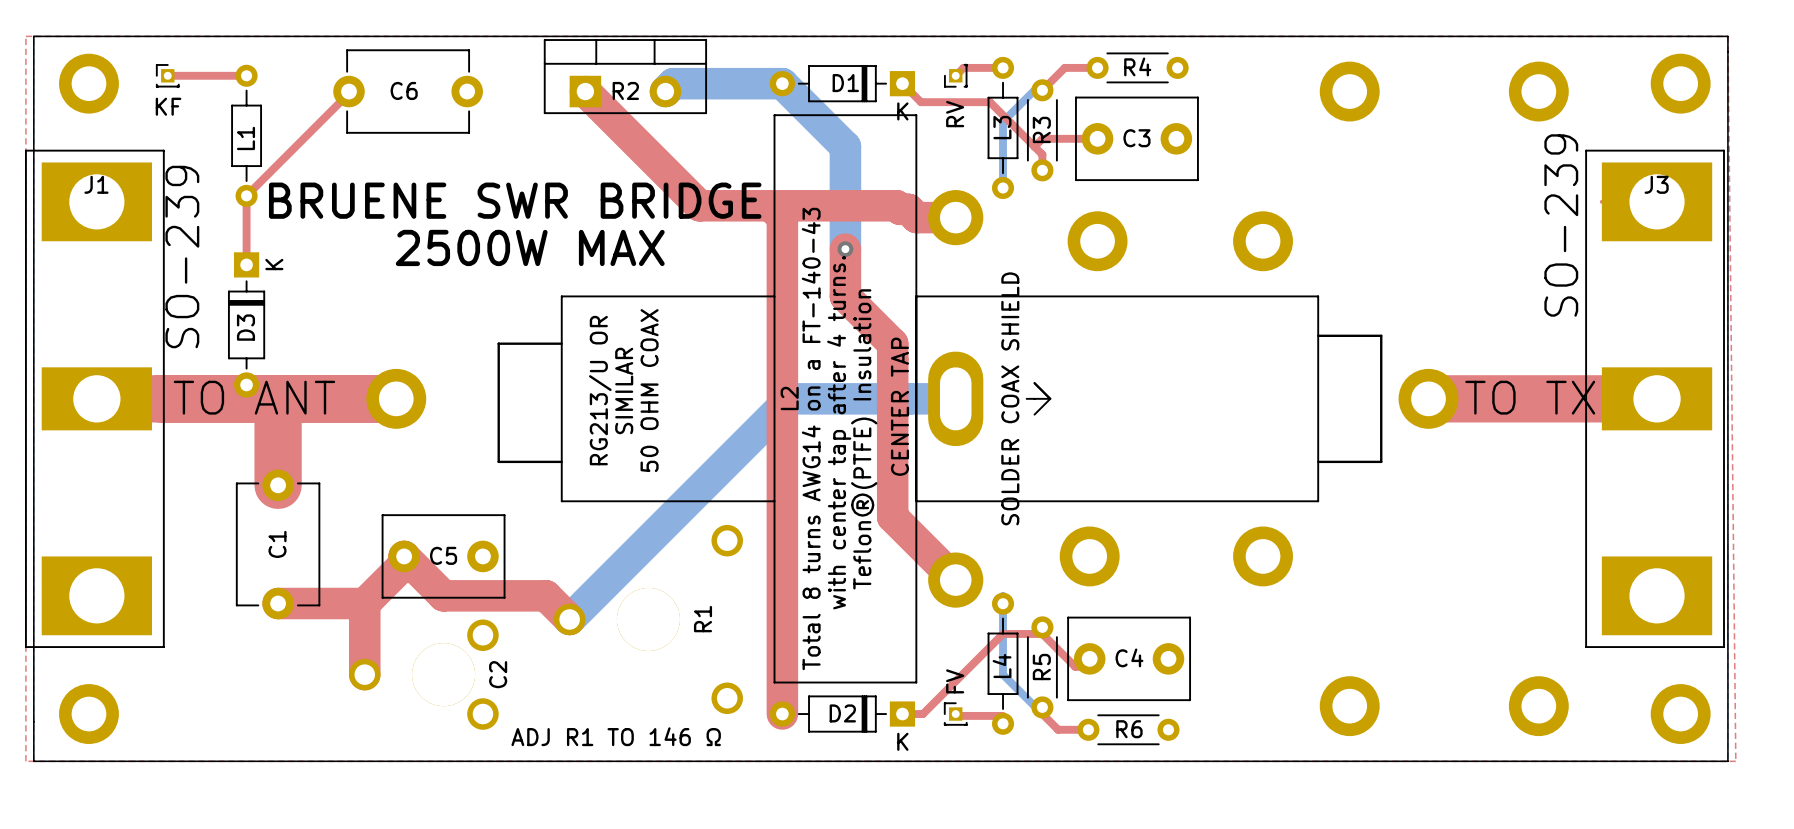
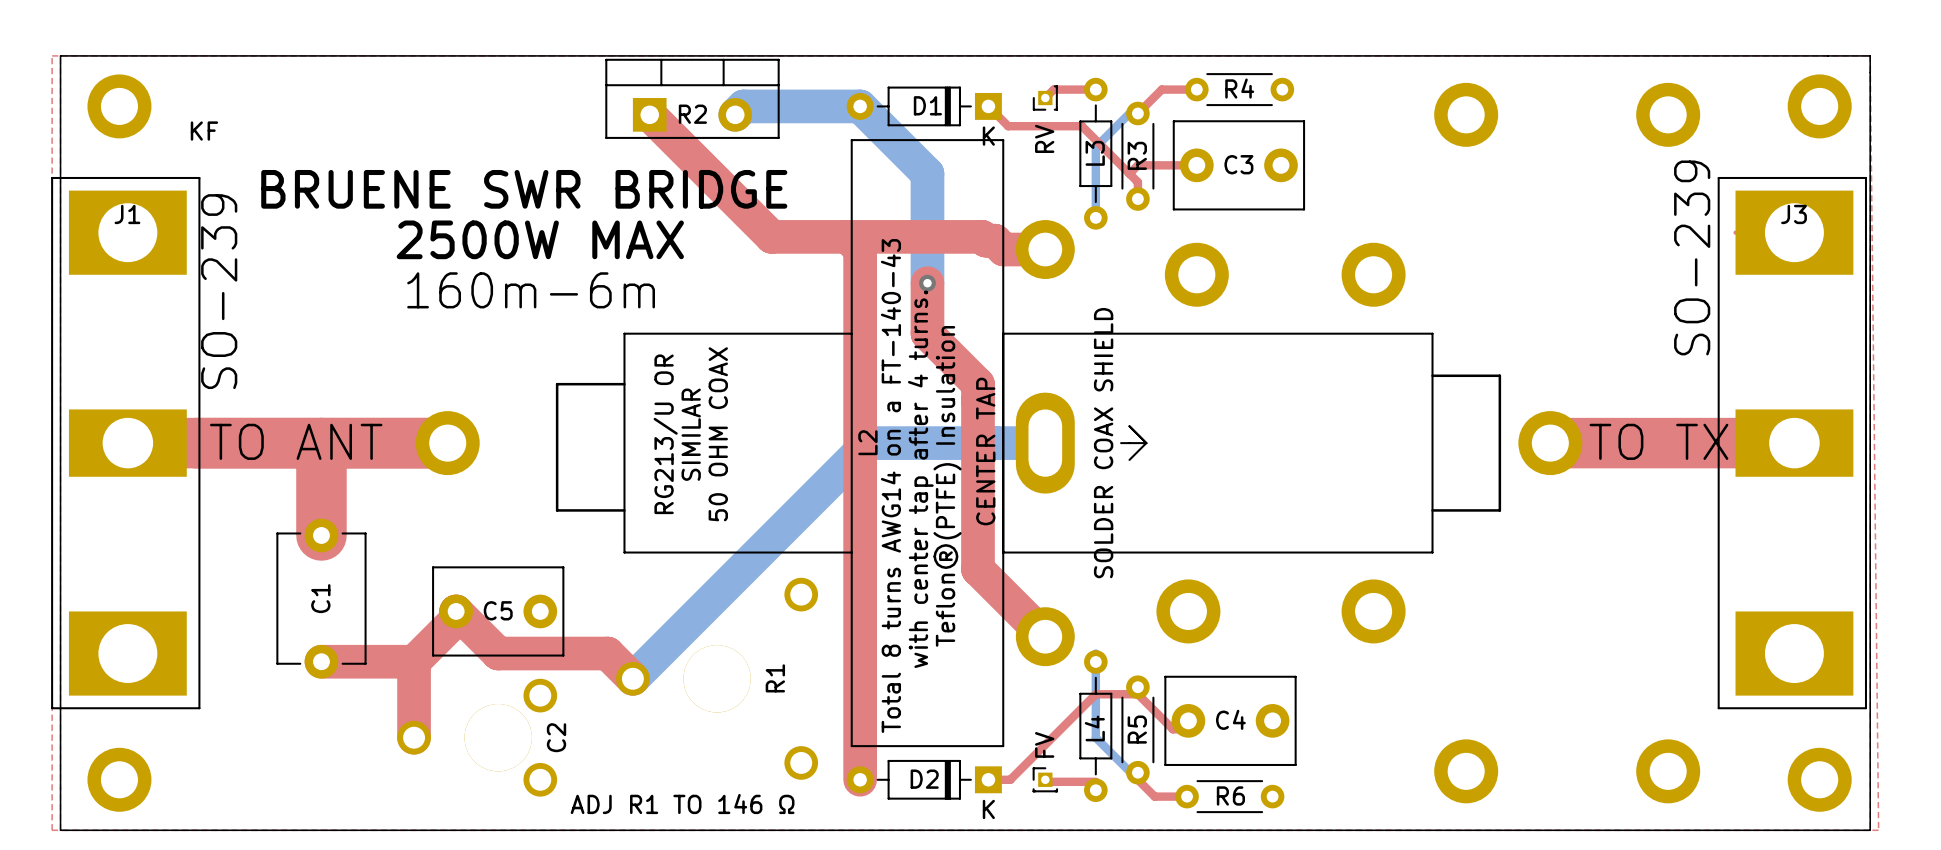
top track: (167, 75) (246, 75) -> none
part: (167, 75) -> none
top track: (349, 91) (246, 195) (246, 264) -> none
C6: (408, 91) -> none
L1: (246, 135) -> none
text position: BRUENE SWR BRIDGE (515, 200) -> BRUENE SWR BRIDGE (524, 189)
text position: 2500W MAX (530, 247) -> 2500W MAX (540, 239)
text: none -> 160m-6m (531, 290)
D3: (246, 324) -> none

